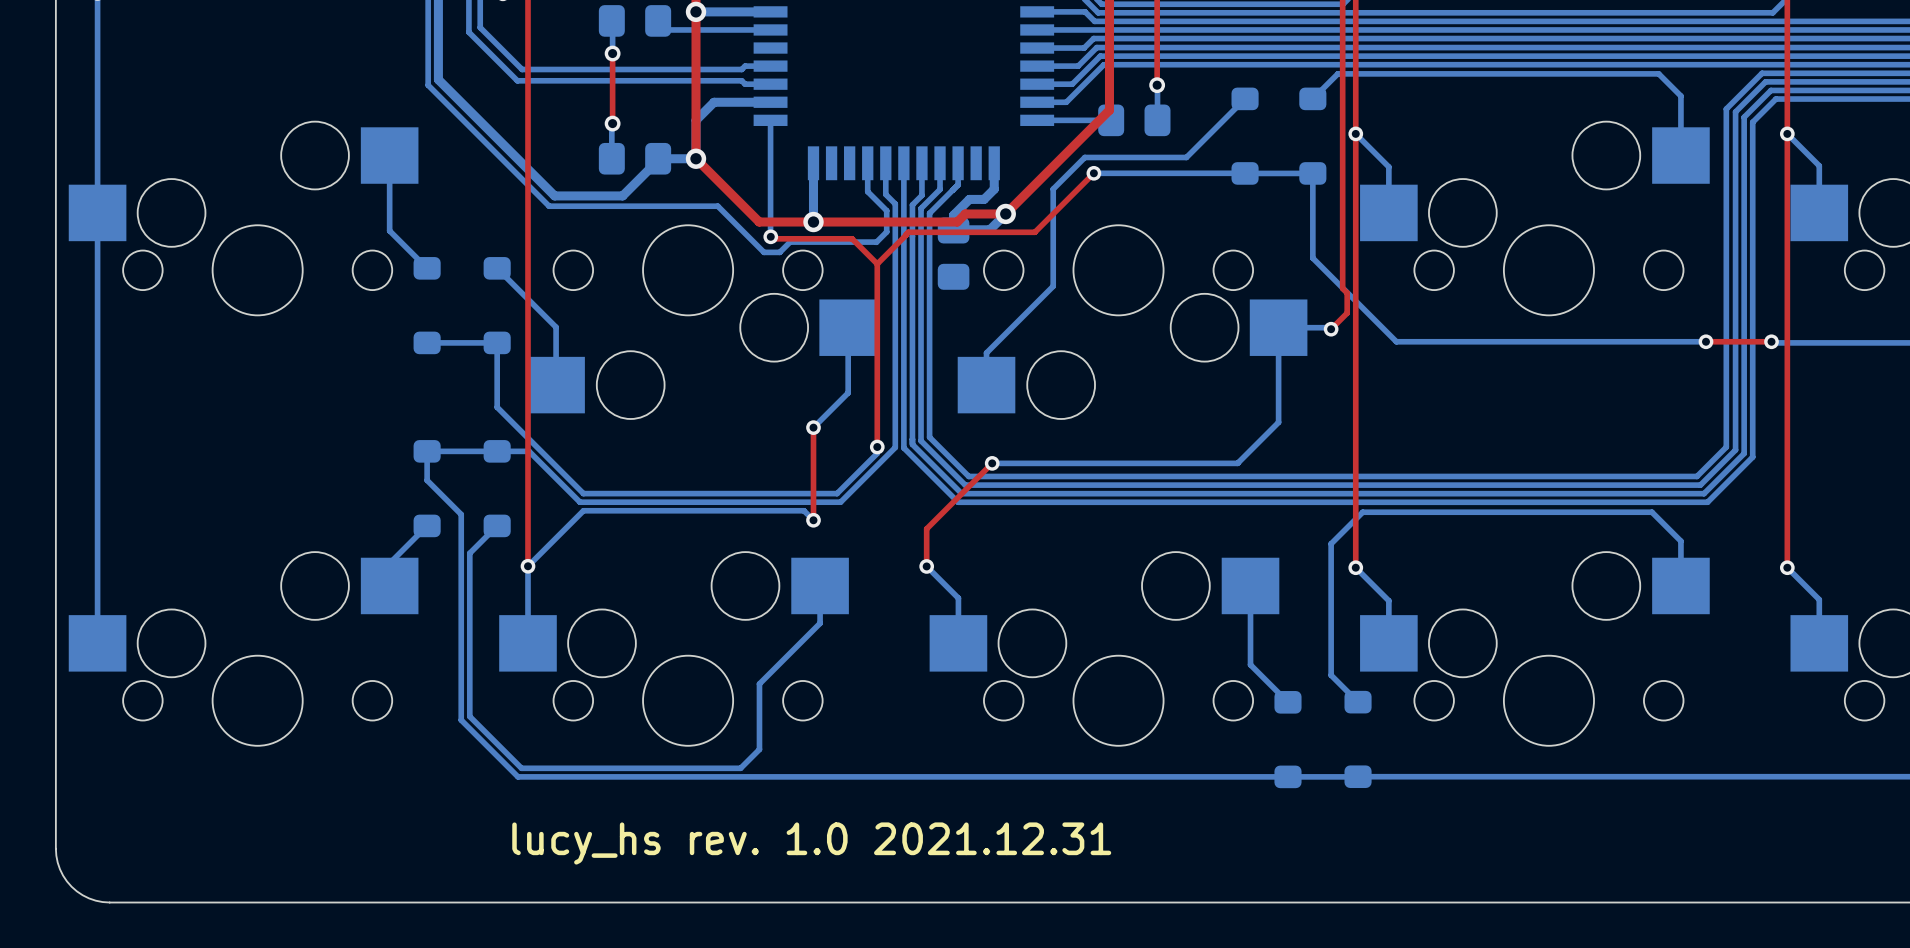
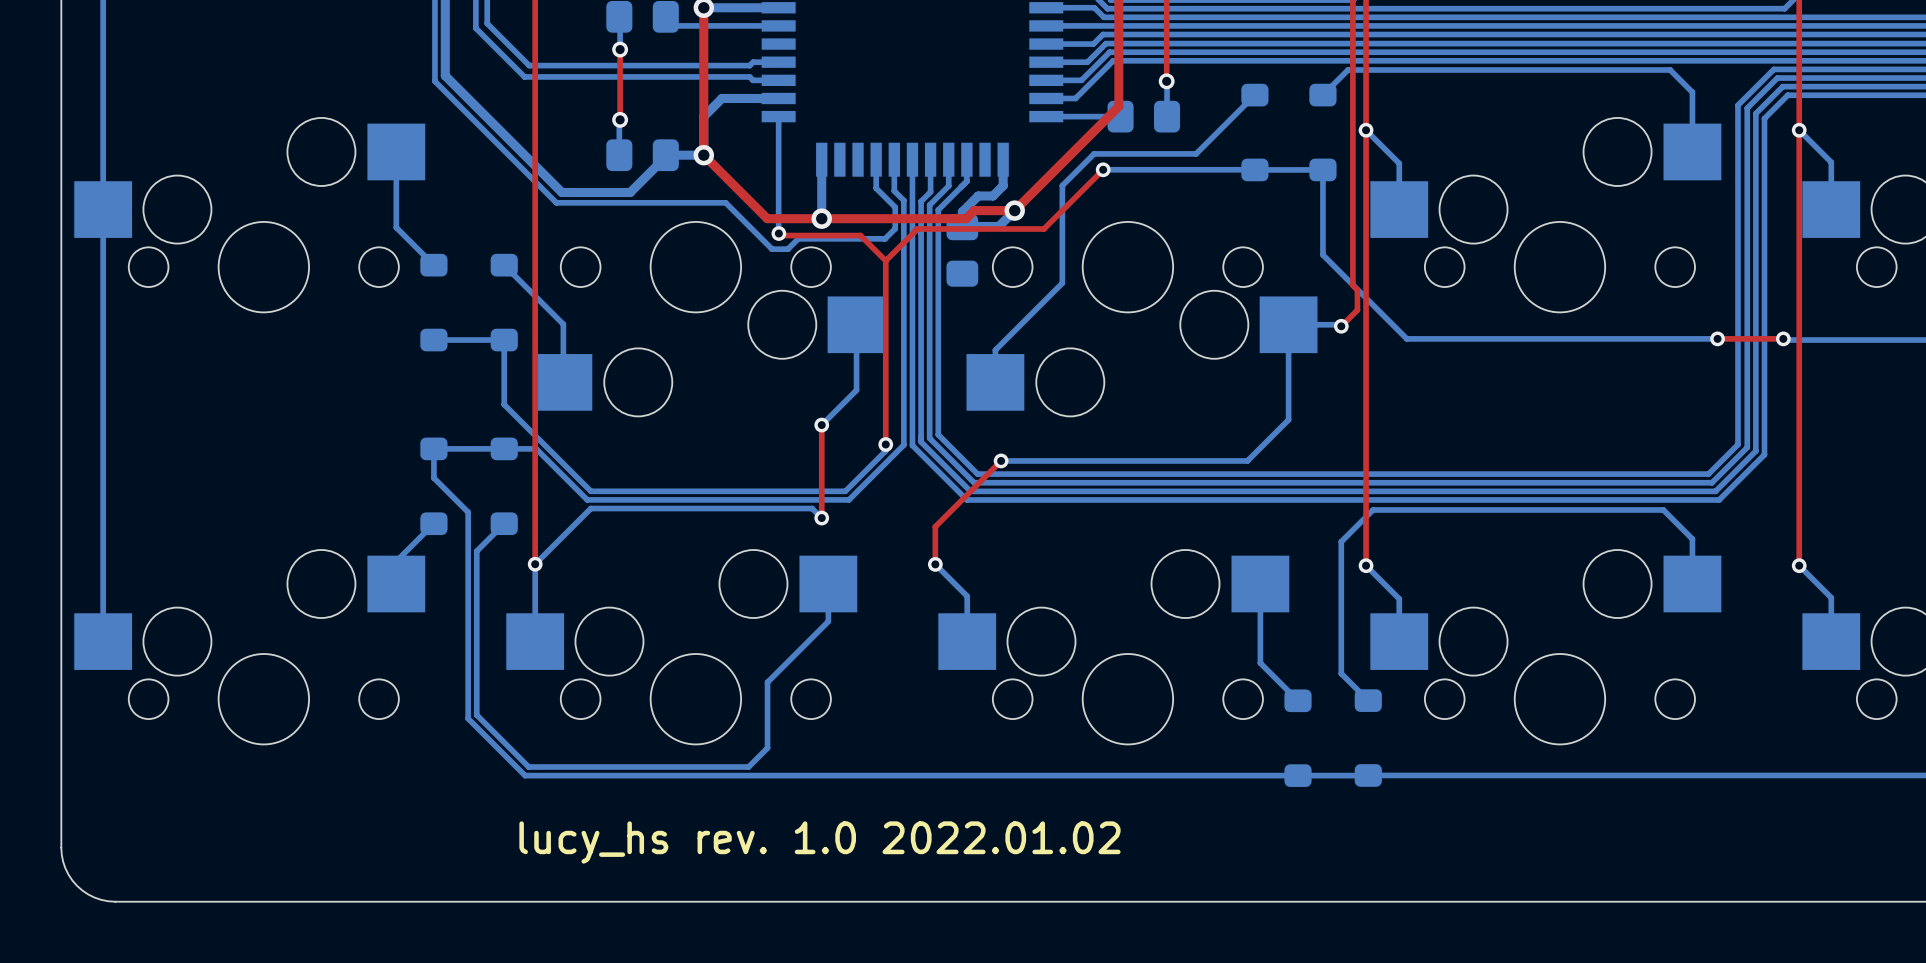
text: lucy_hs rev. 1.0 2021.12.31 (811, 843) -> lucy_hs rev. 1.0 2022.01.02 (819, 842)

